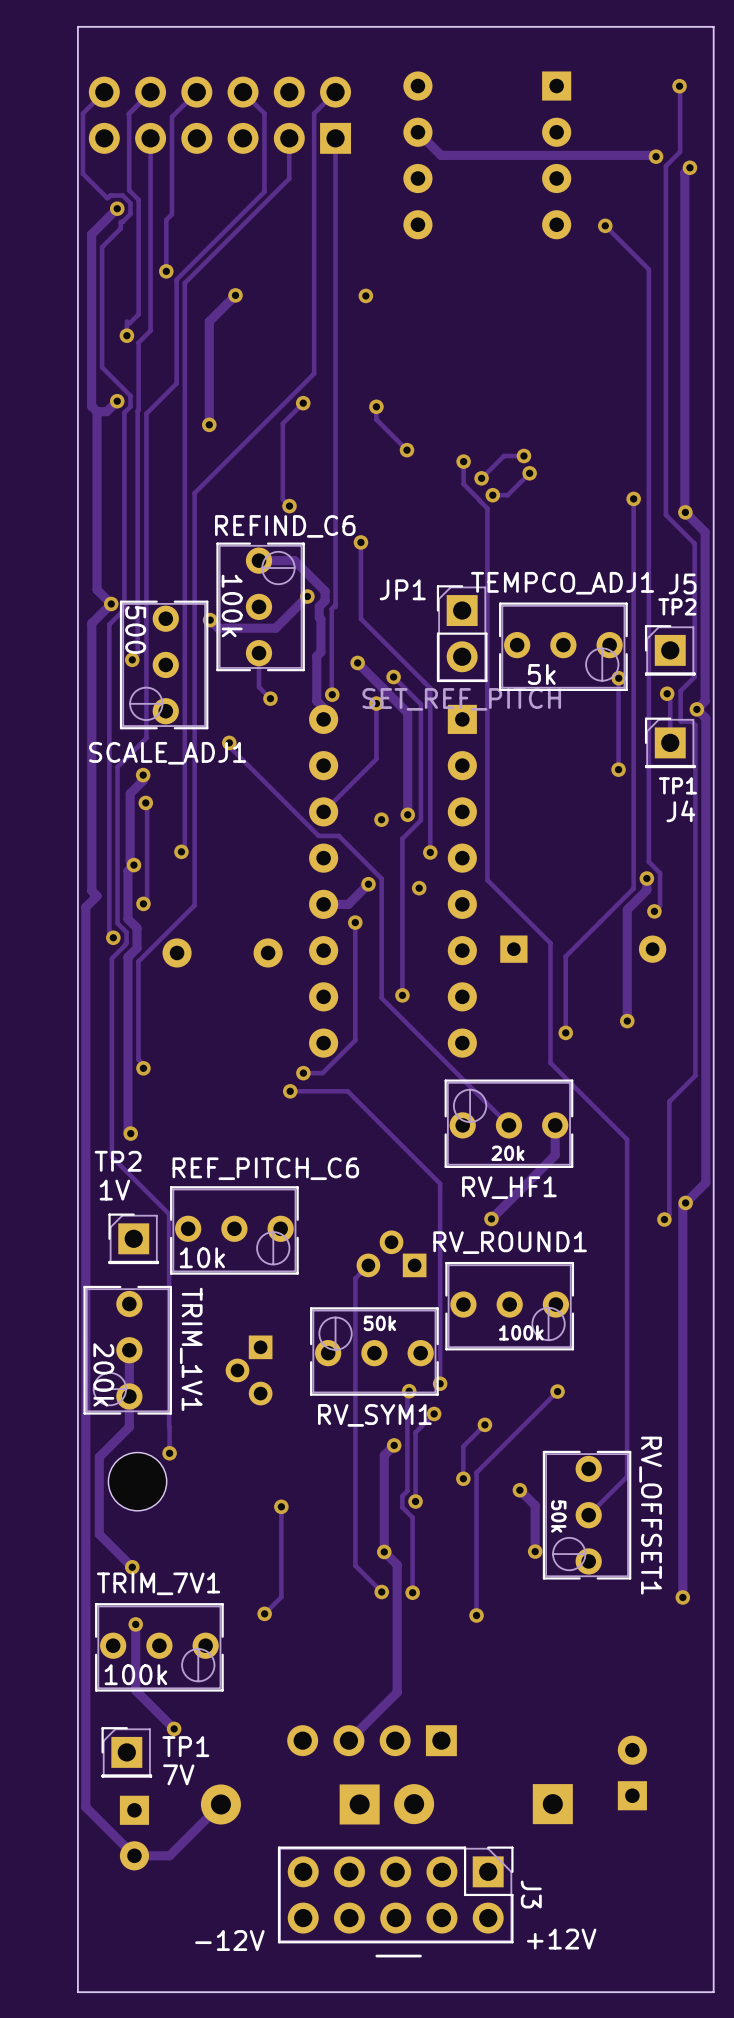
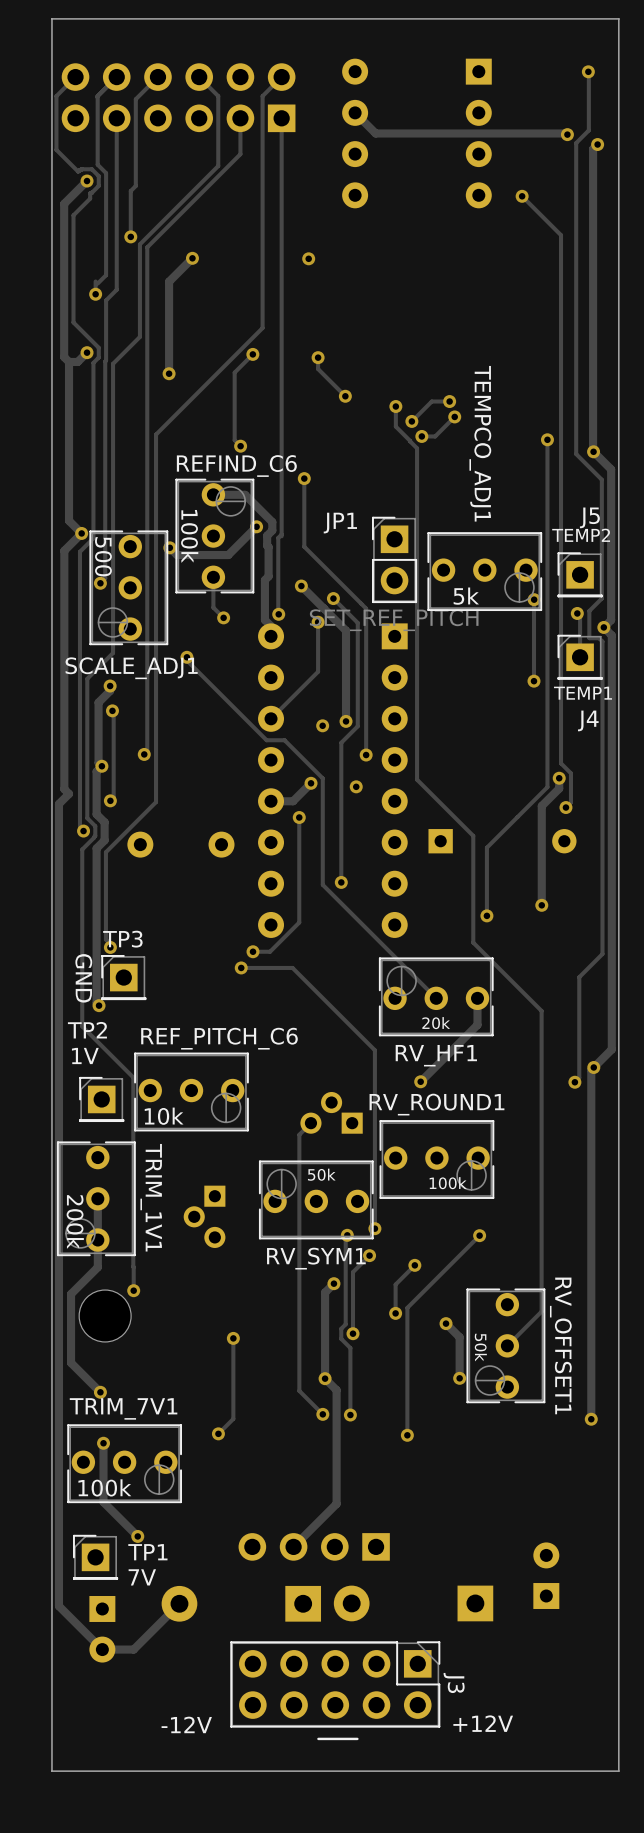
TEMPCO_ADJ1 name rotation: 0° (562, 583) -> 90° clockwise (480, 443)
J5 value: TP2 (677, 606) -> TEMP2 (581, 535)
J4 value: TP1 (677, 785) -> TEMP1 (582, 693)
TP3: none -> GND (123, 977)

